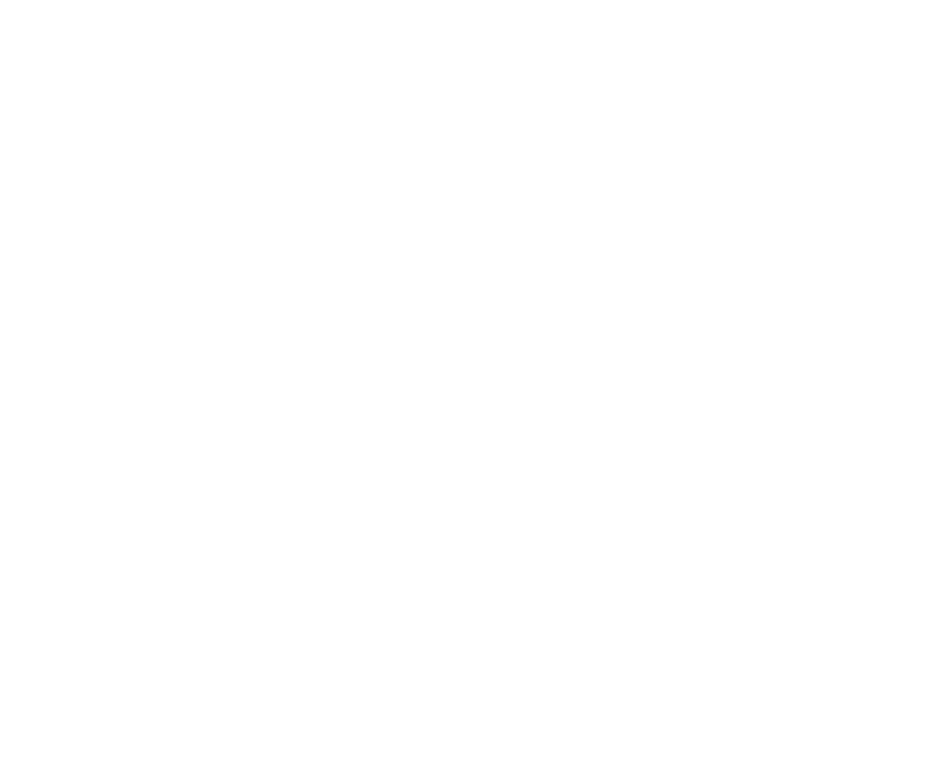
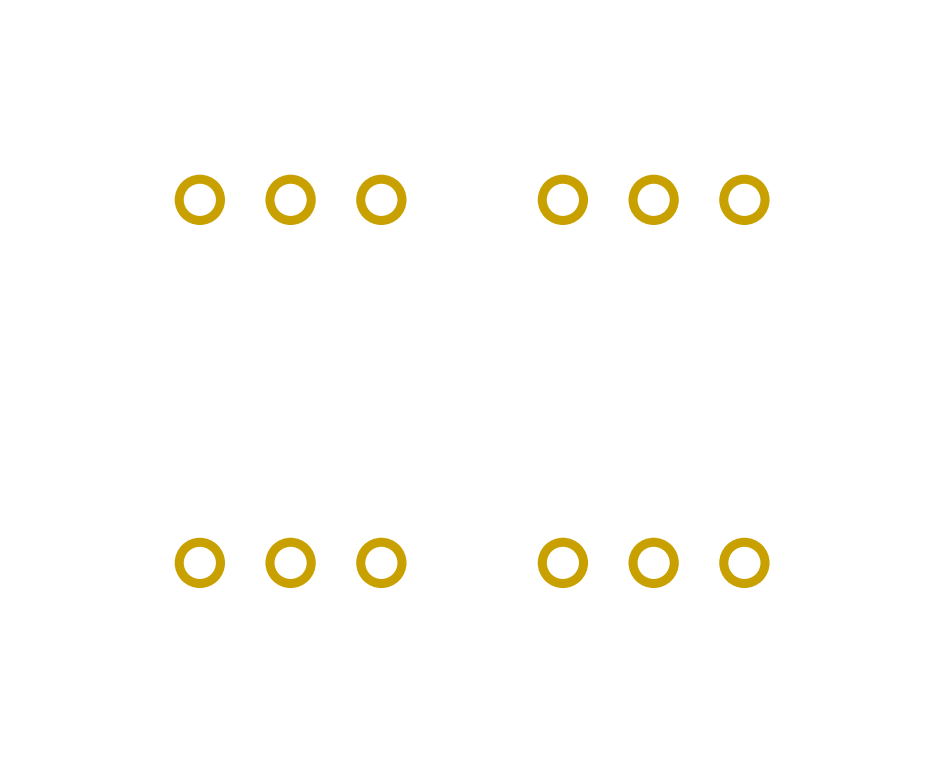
part: none -> (290, 199)
part: none -> (653, 199)
part: none -> (290, 562)
part: none -> (653, 562)

